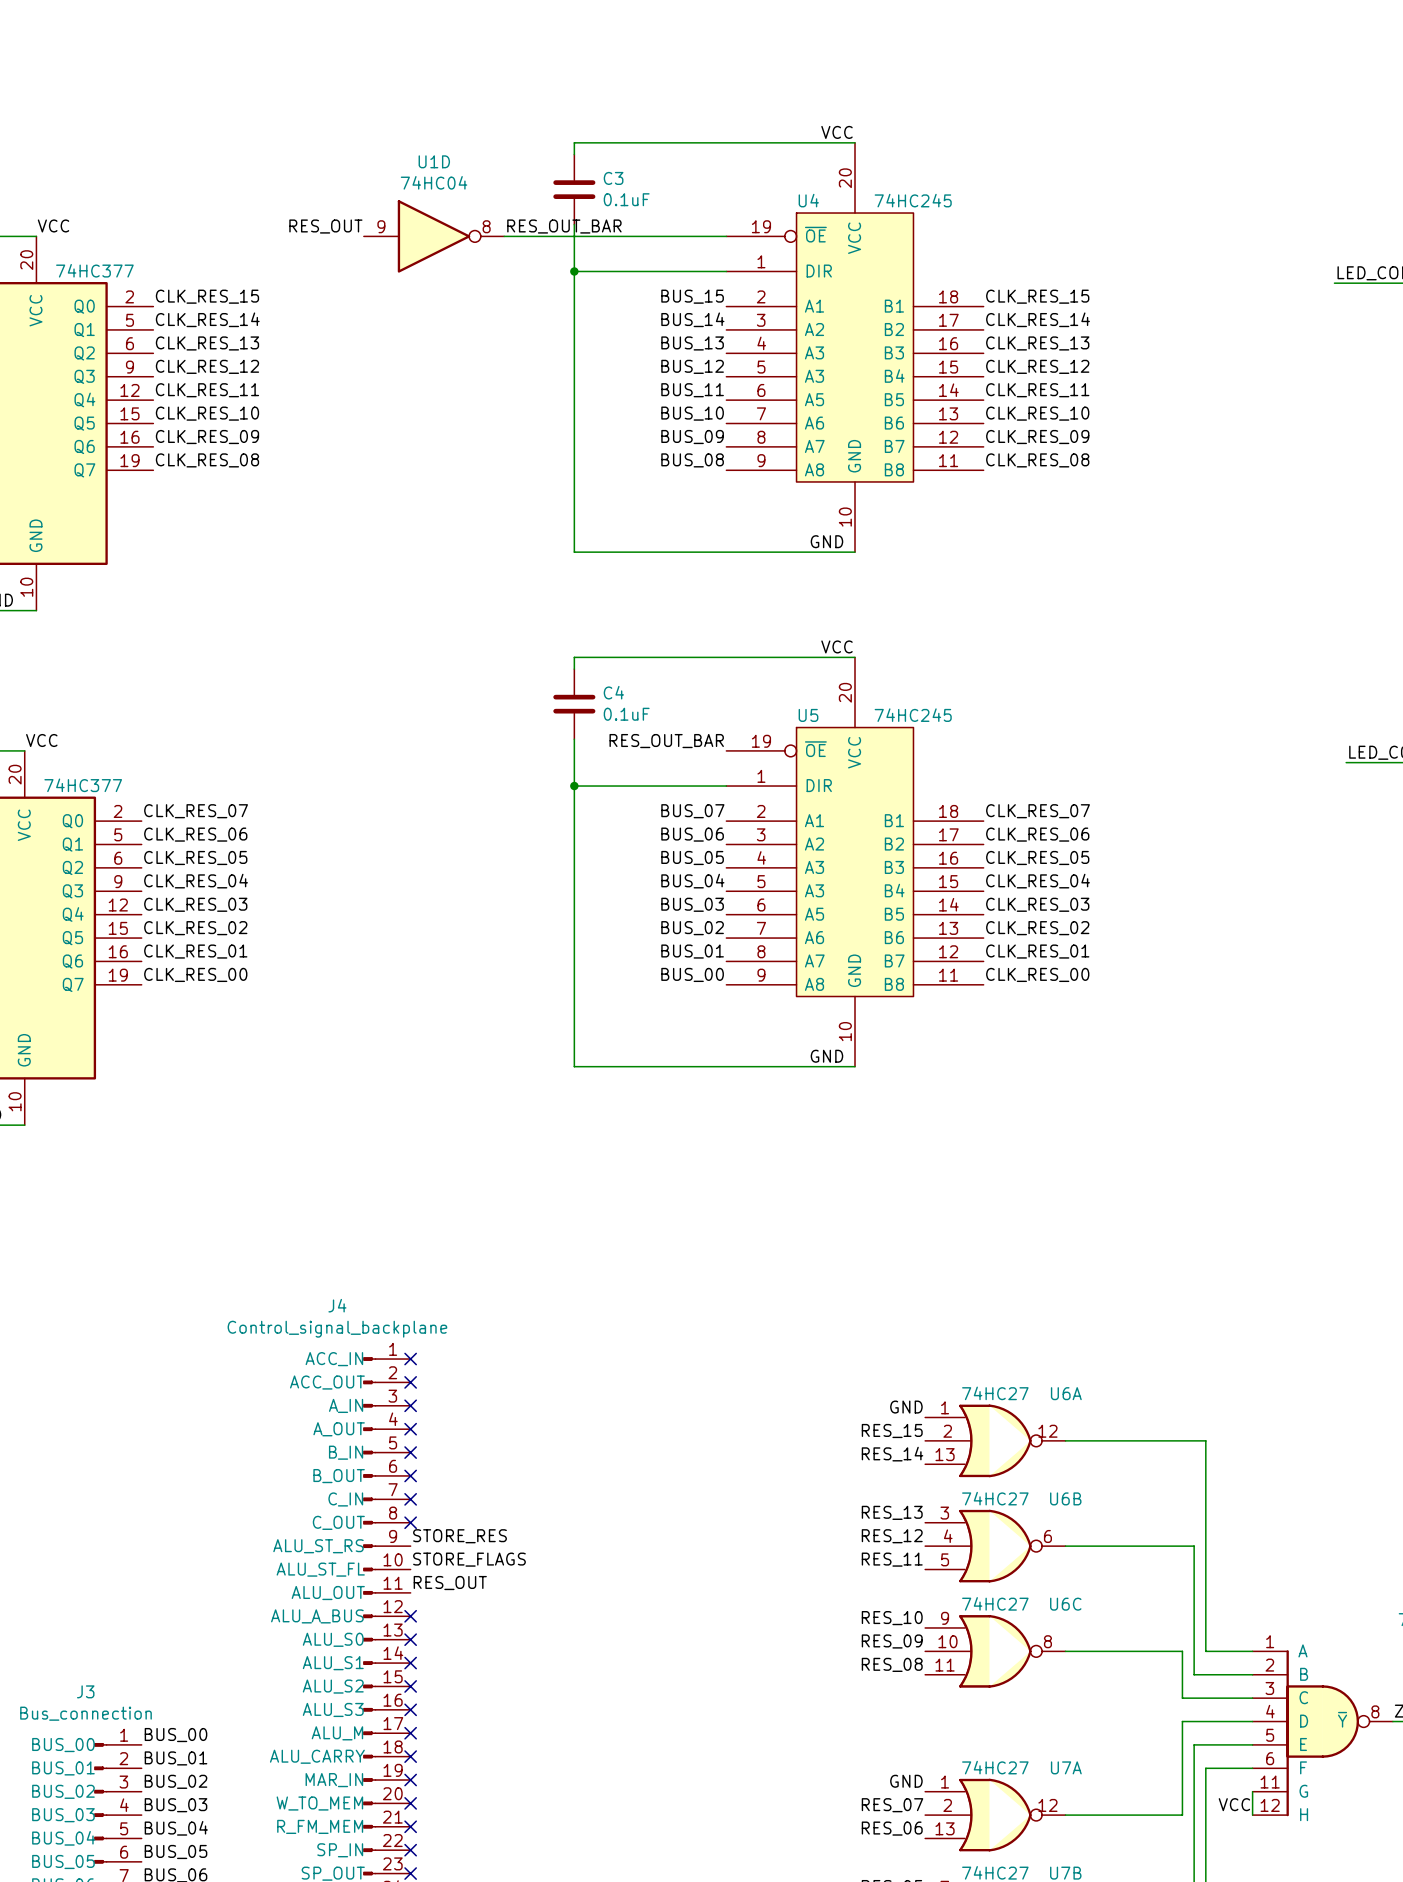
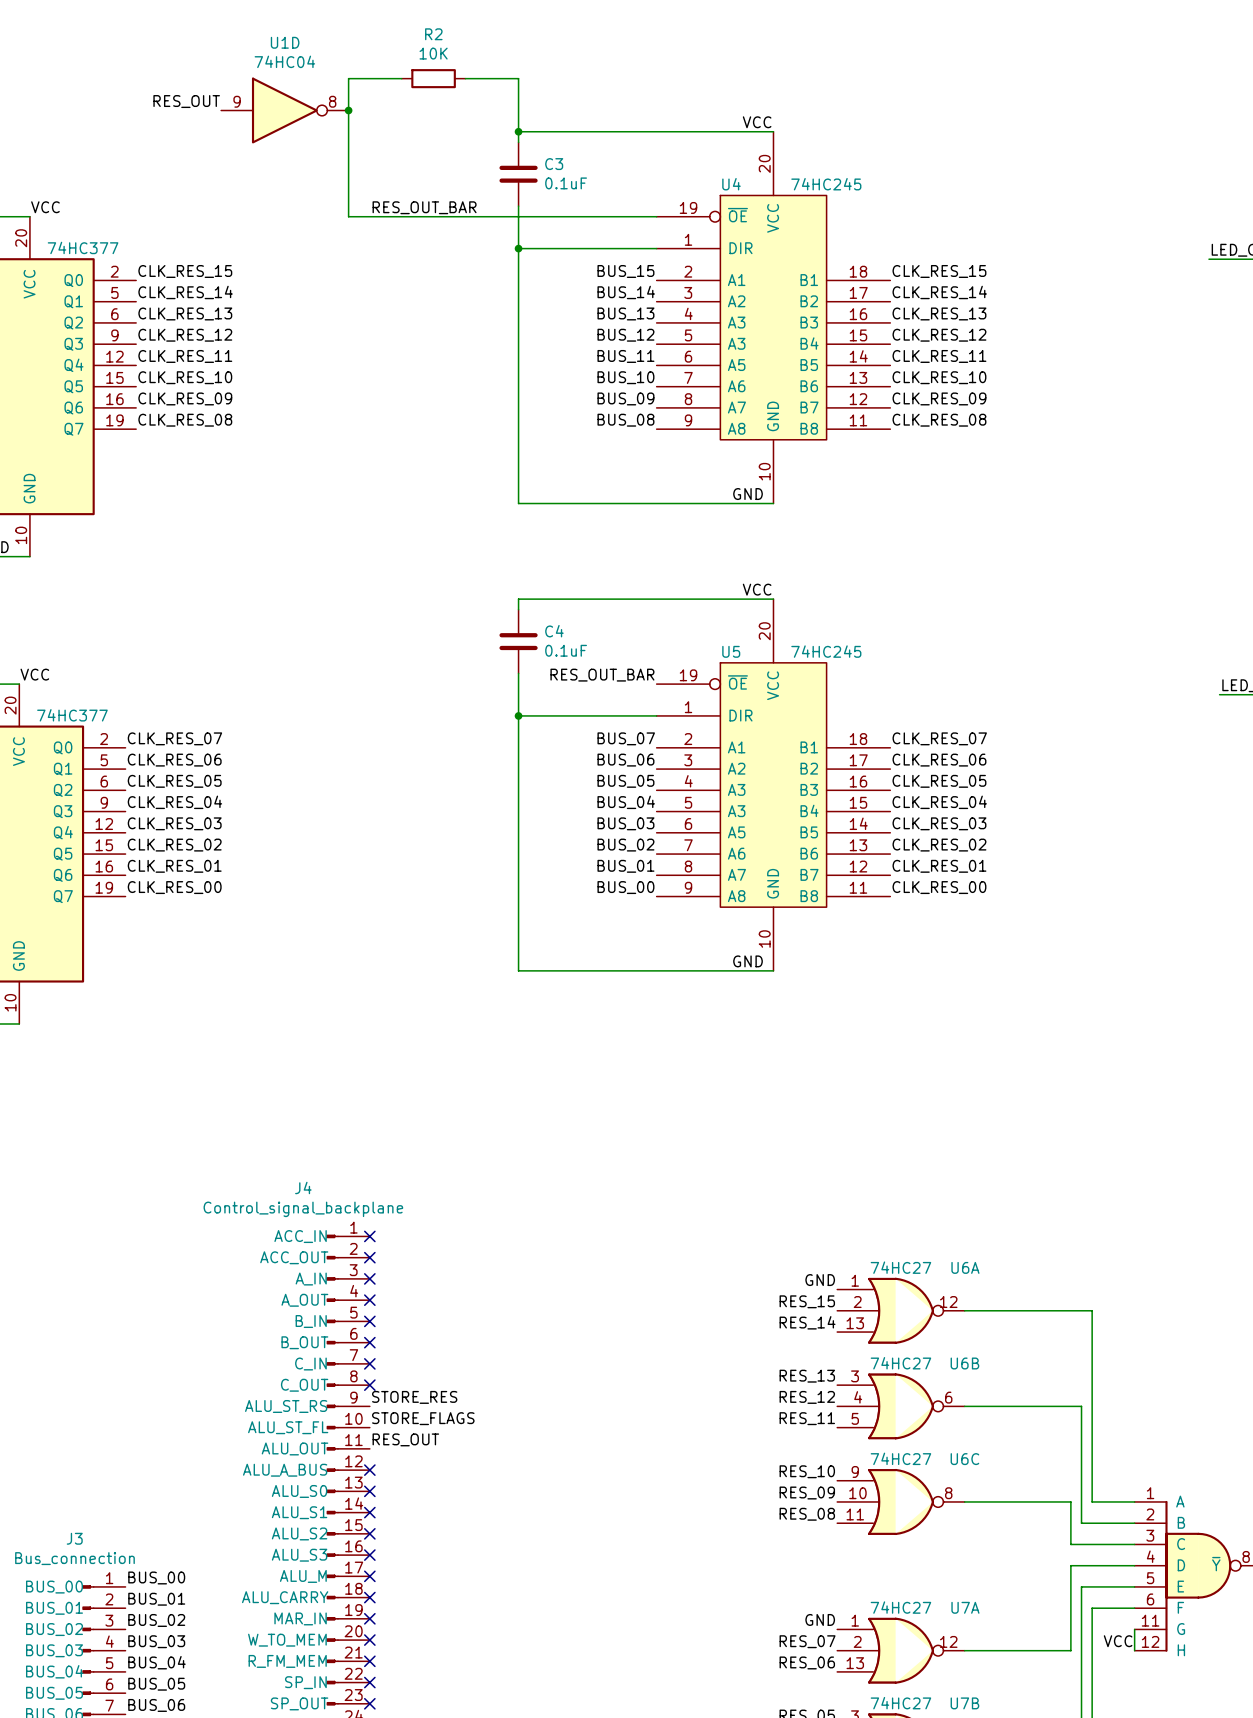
wire: none -> (401, 78) (348, 78) (348, 216) (454, 216)
R2: none -> 10K (433, 78)
wire: none -> (465, 78) (518, 78) (518, 131)
junction: none -> (348, 110)
junction: none -> (518, 131)
label position: RES_OUT (325, 226) -> RES_OUT (186, 101)
label position: RES_OUT_BAR (564, 226) -> RES_OUT_BAR (424, 207)
U1D position: (434, 236) -> (284, 110)

